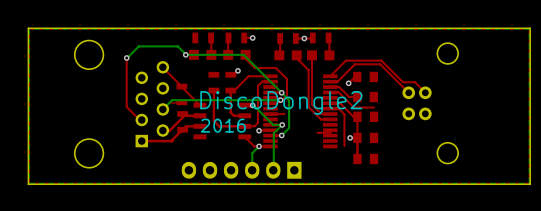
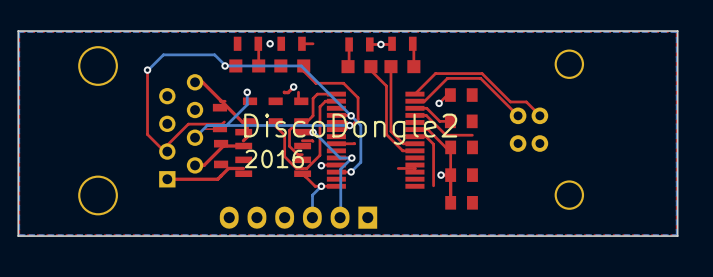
via: none -> (270, 43)
top track: (228, 37) (228, 52) -> none
via: (252, 37) -> none
top track: (162, 67) (199, 105) -> none
top track: none -> (201, 82) (195, 82) (202, 82) (242, 122) (247, 122) (247, 136) (243, 140)
bottom track: none -> (247, 92) (247, 104) (226, 125)
via: none -> (247, 92)
top track: none -> (298, 92) (298, 101)
top track: (256, 76) (248, 76) (234, 90) (230, 90) -> (317, 94) (313, 98) (313, 115) (306, 122) (297, 122) (289, 130) (289, 146) (297, 154) (302, 154)
top track: none -> (225, 101) (220, 101)
part: (213, 82) -> none
part: (230, 82) -> none
top track: (230, 88) (230, 112) (233, 115) (244, 115) -> none
part: none -> (250, 111)
part: none -> (275, 111)
part: none -> (301, 111)
top track: (213, 90) (213, 121) (219, 126) (254, 126) -> (271, 122) (284, 135) (284, 156) (296, 168) (306, 168) (315, 159)
top track: none -> (224, 122) (222, 124) (188, 124) (167, 145)
top track: none -> (302, 140) (313, 141)
top track: (199, 126) (186, 126) (171, 141) -> none
top track: none -> (243, 168) (228, 168) (217, 179) (208, 179)

